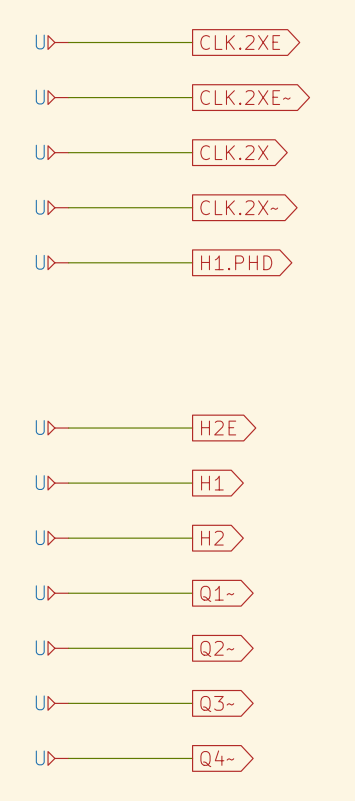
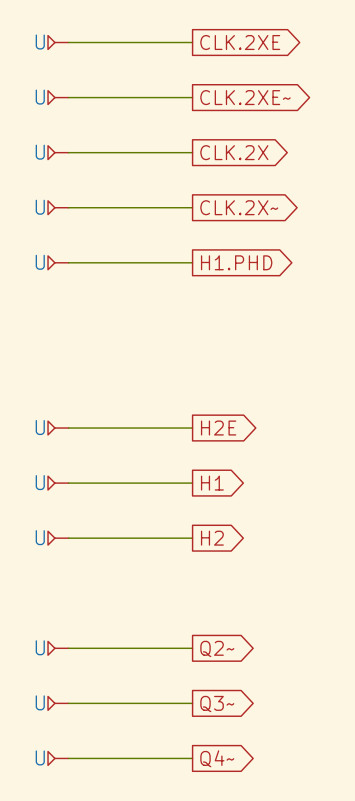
U: (58, 593) -> none
wire: (68, 593) (192, 593) -> none
global label: Q1~ (217, 593) -> none

